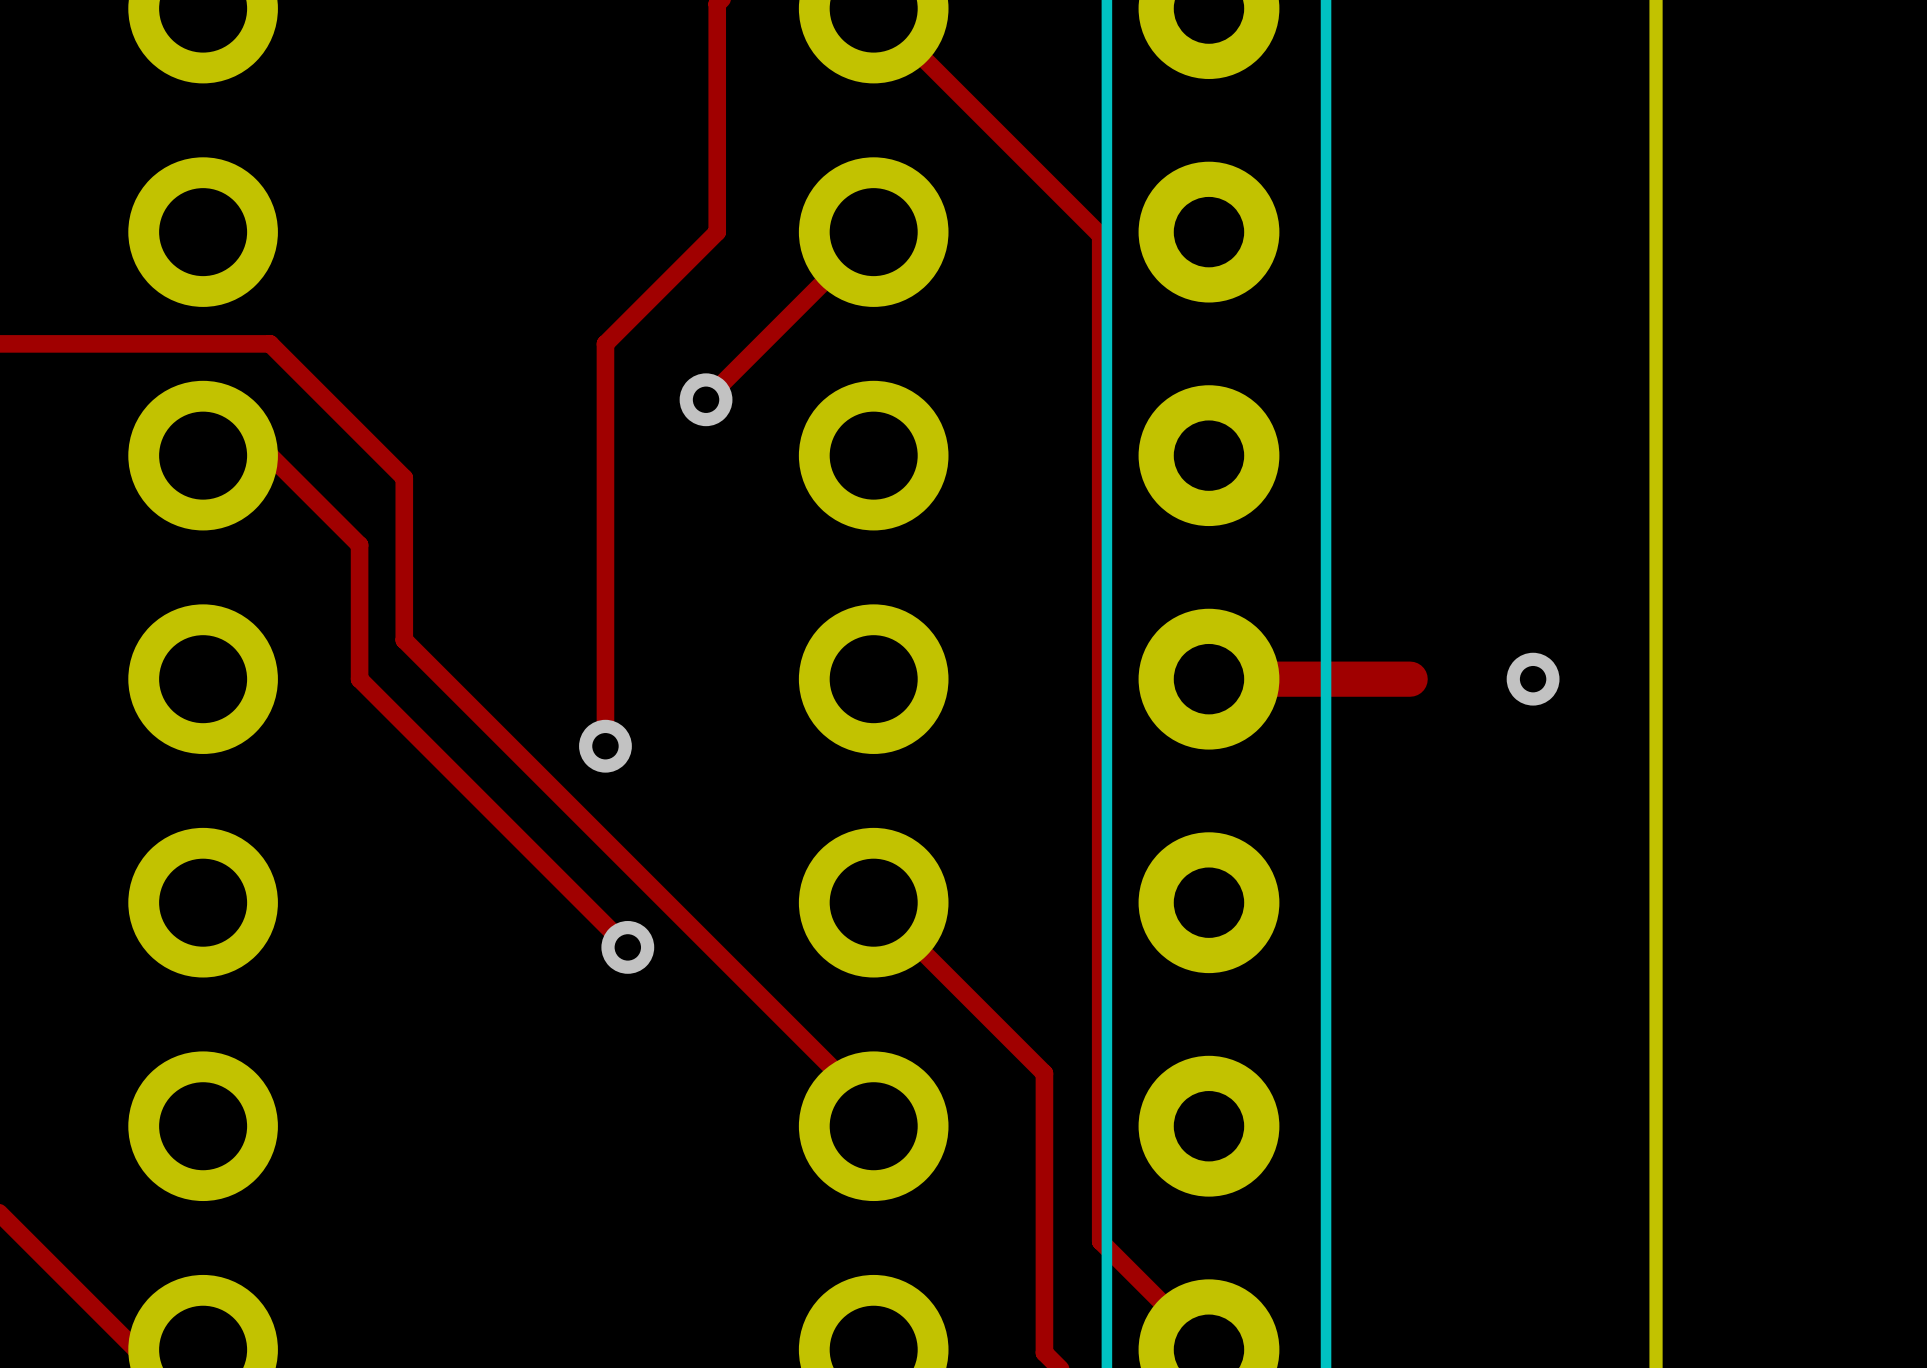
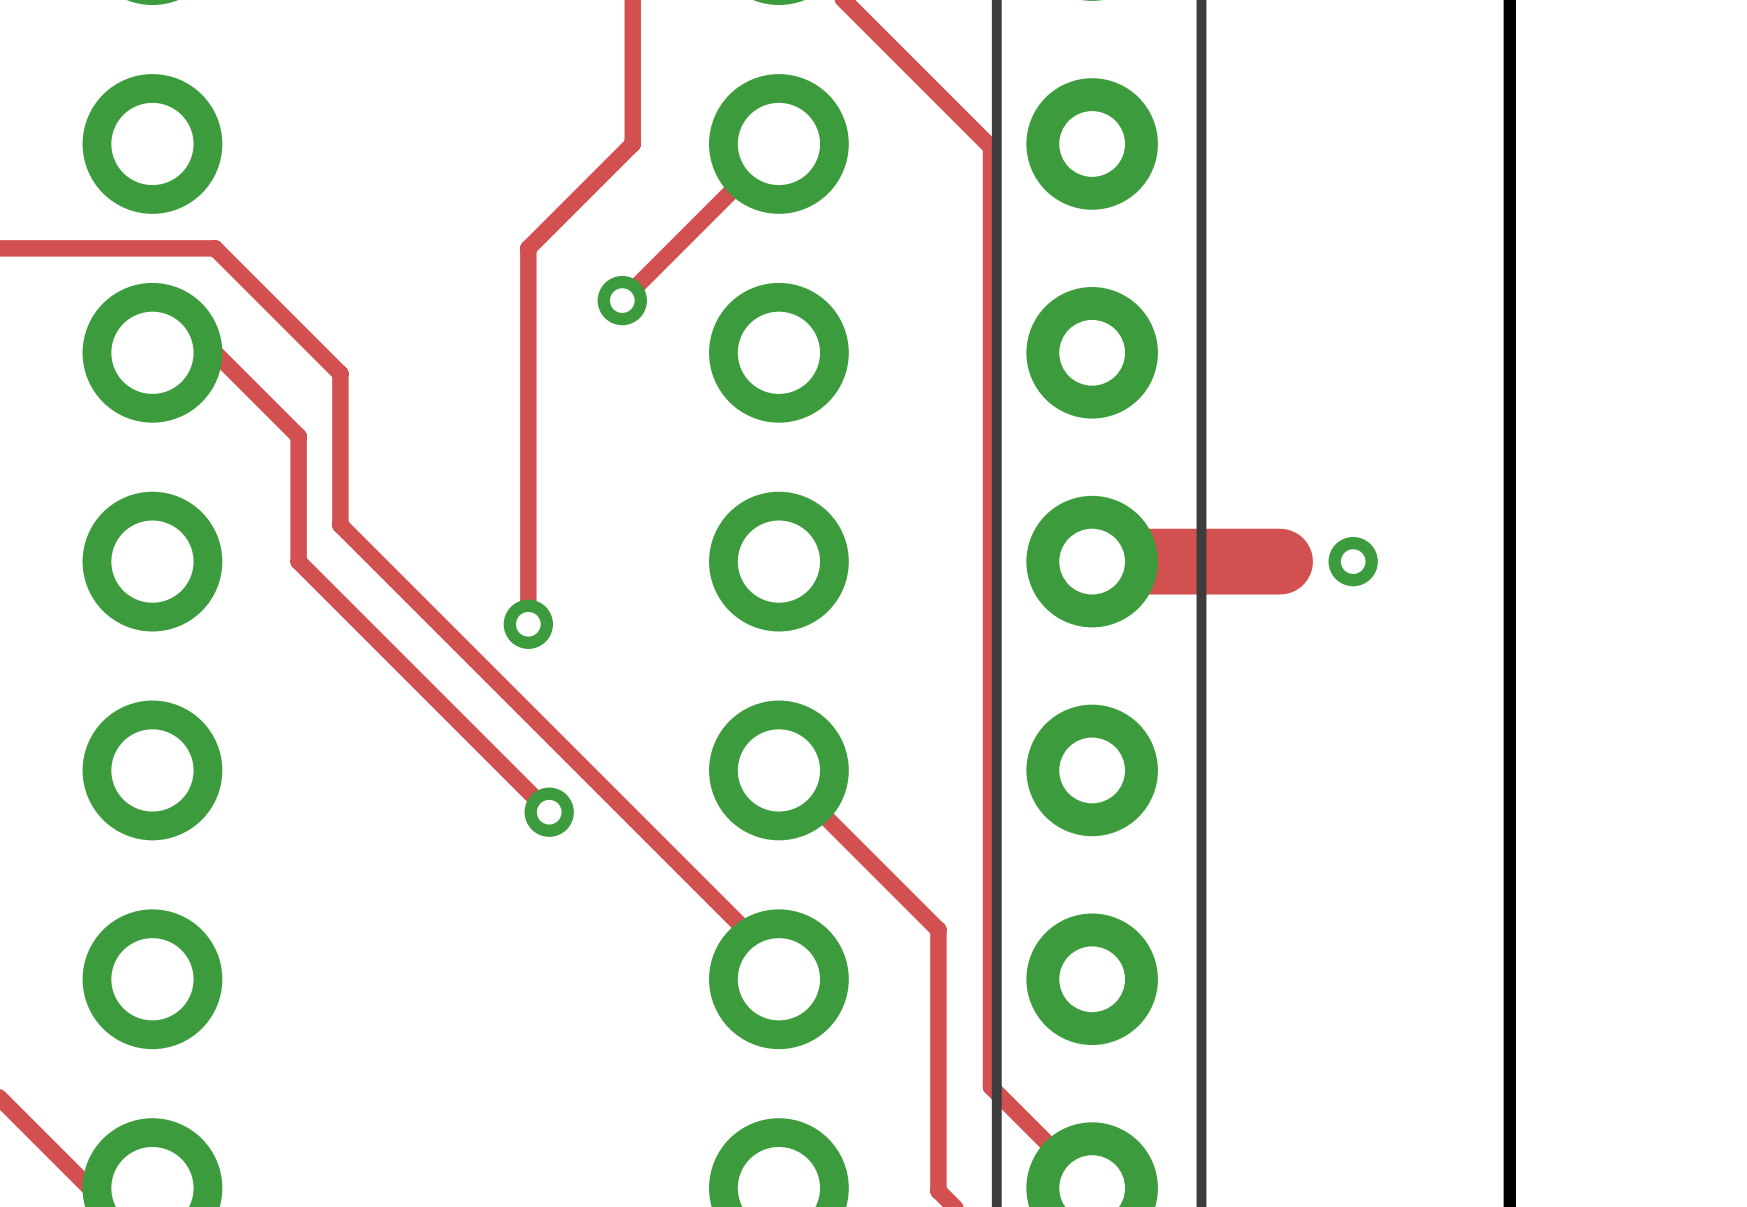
track width: thin (1208, 679) (1410, 679) -> thick (1092, 561) (1280, 561)
via position: (1533, 679) -> (1353, 561)

